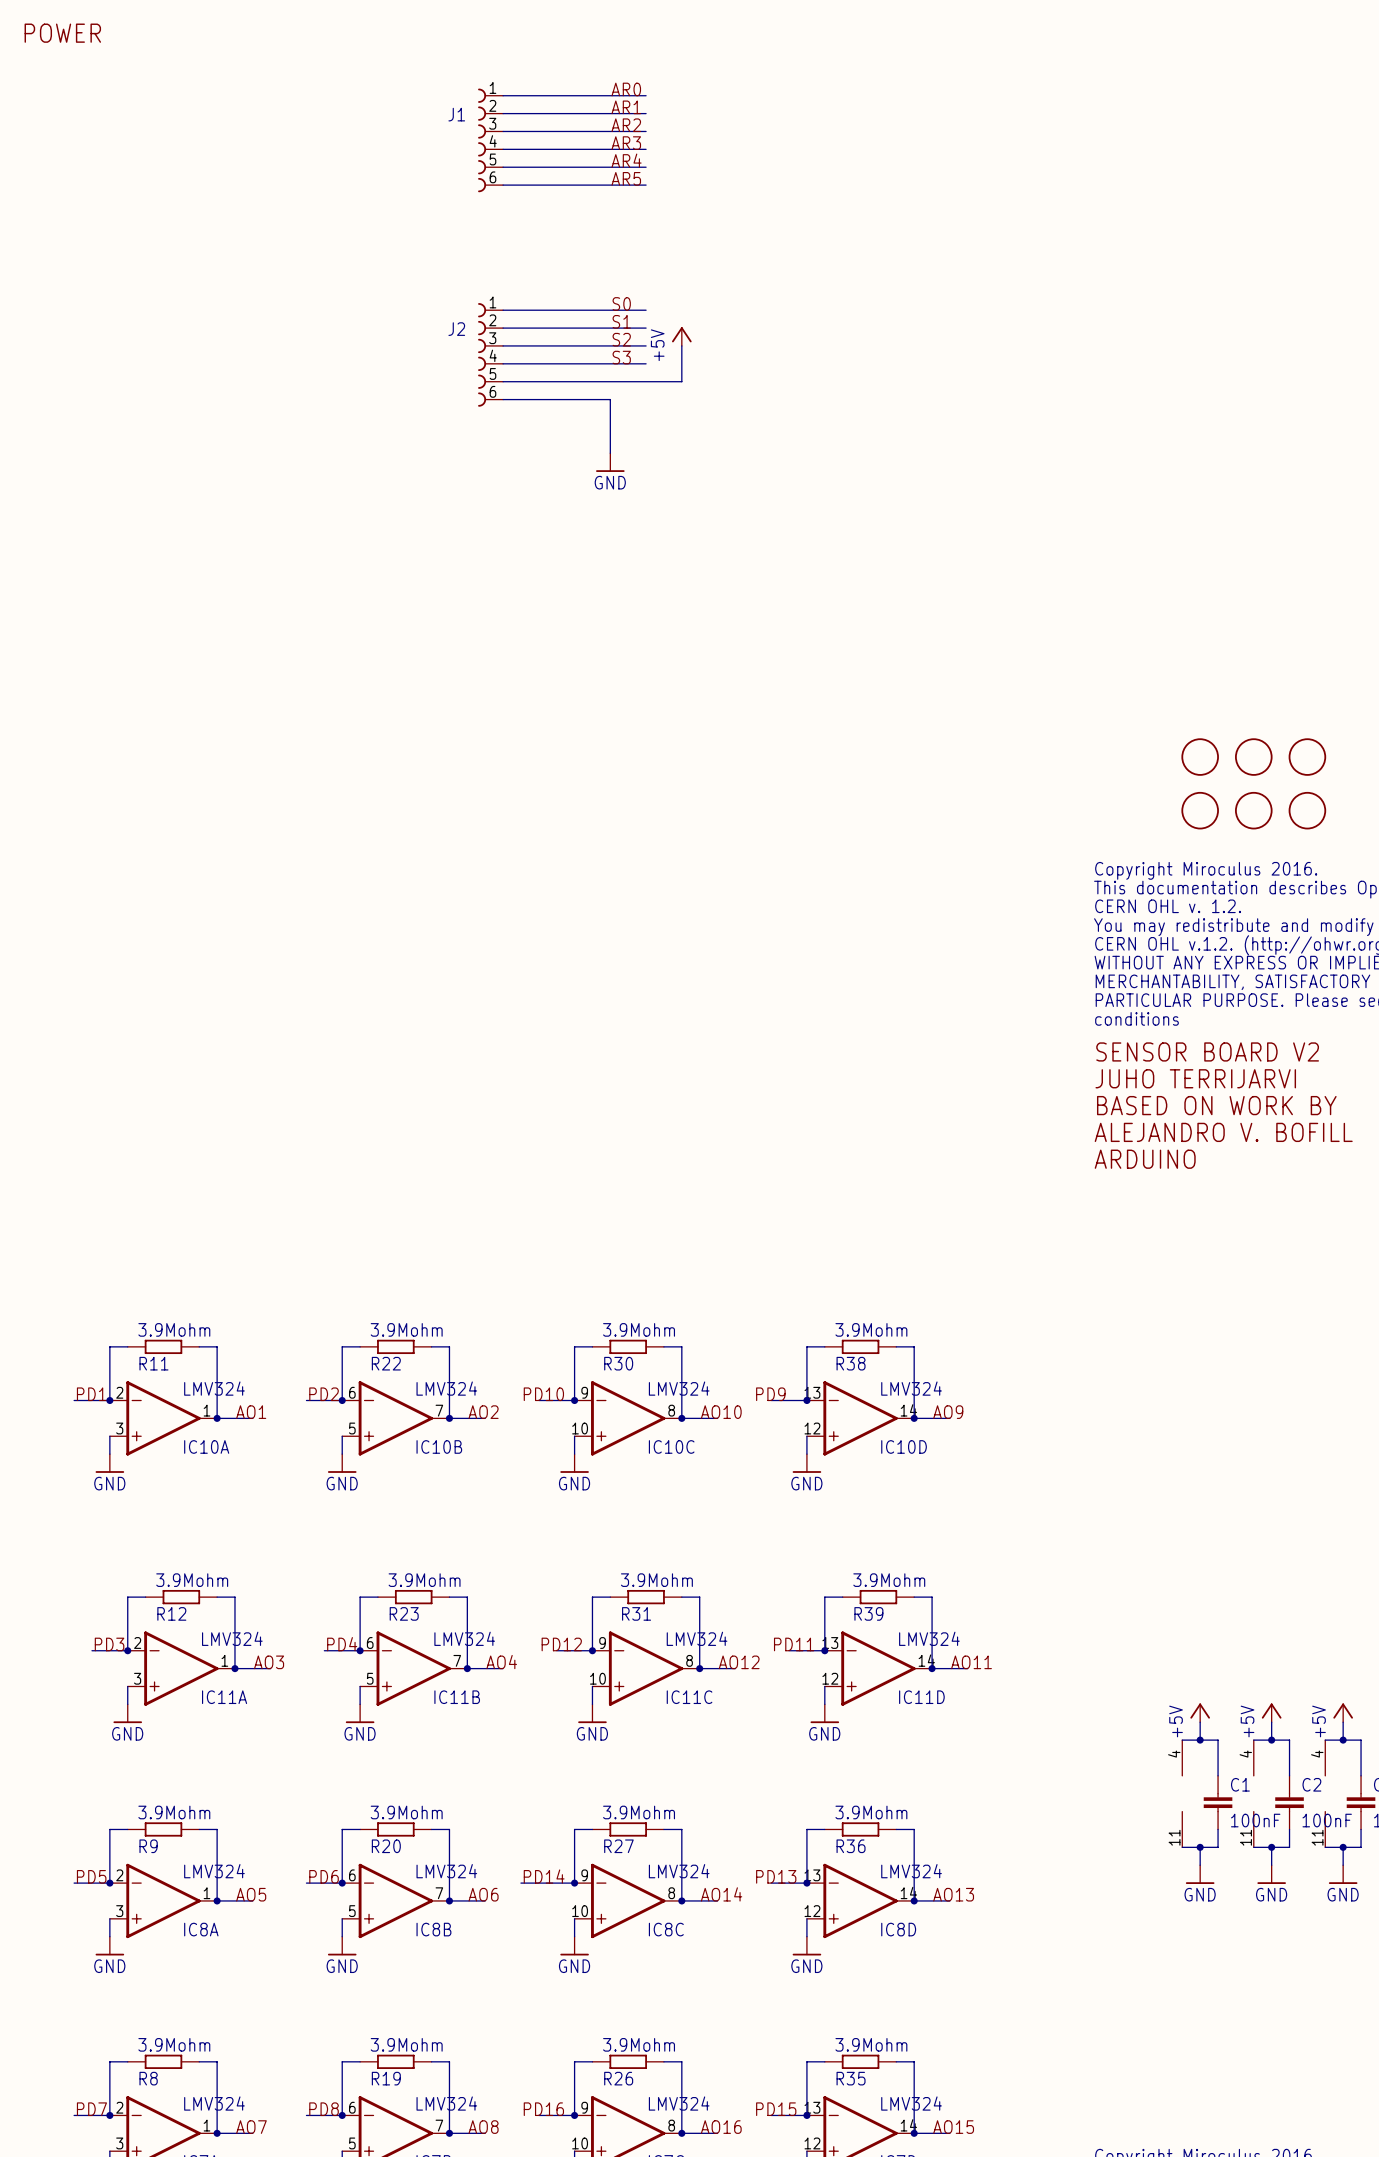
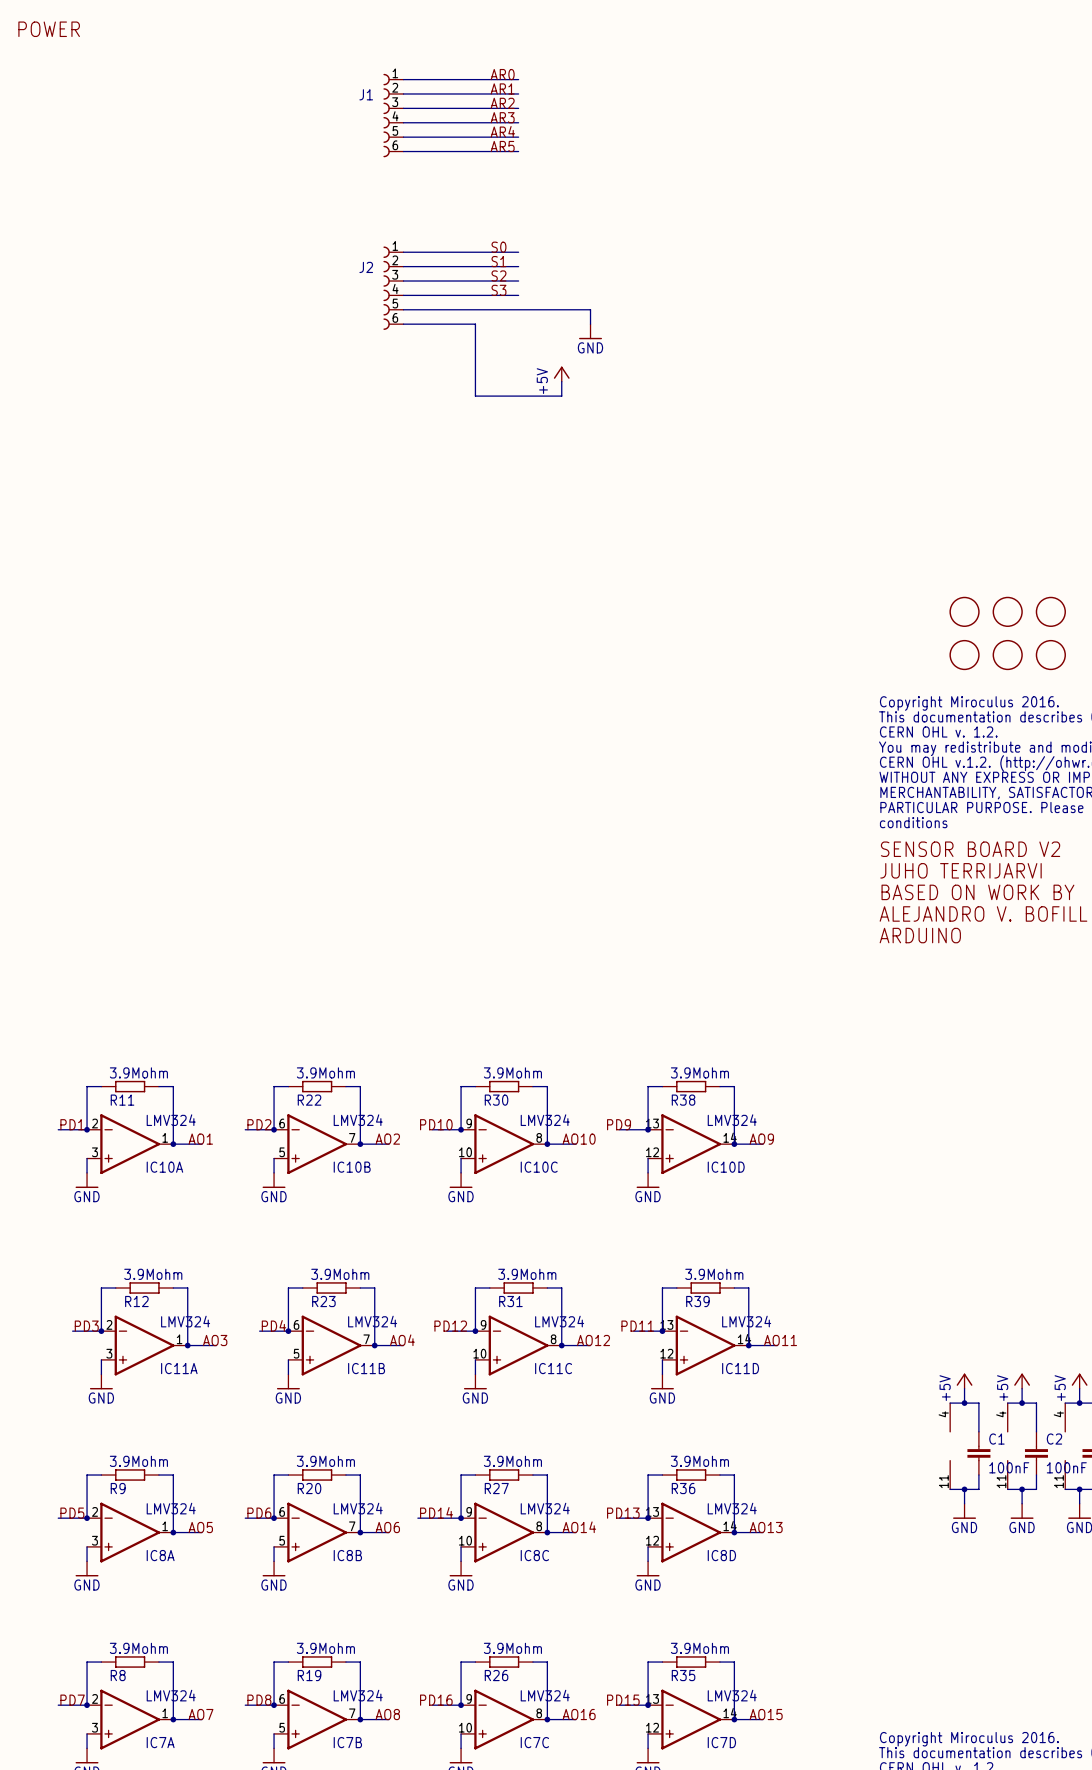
power symbol position: +5V (681, 336) -> +5V (561, 374)
wire: (681, 345) (681, 381) -> (590, 324) (590, 309) (547, 309)
wire: (592, 399) (610, 399) (610, 453) -> (475, 324) (475, 396) (561, 396) (561, 381)
power symbol position: GND (610, 462) -> GND (590, 331)

